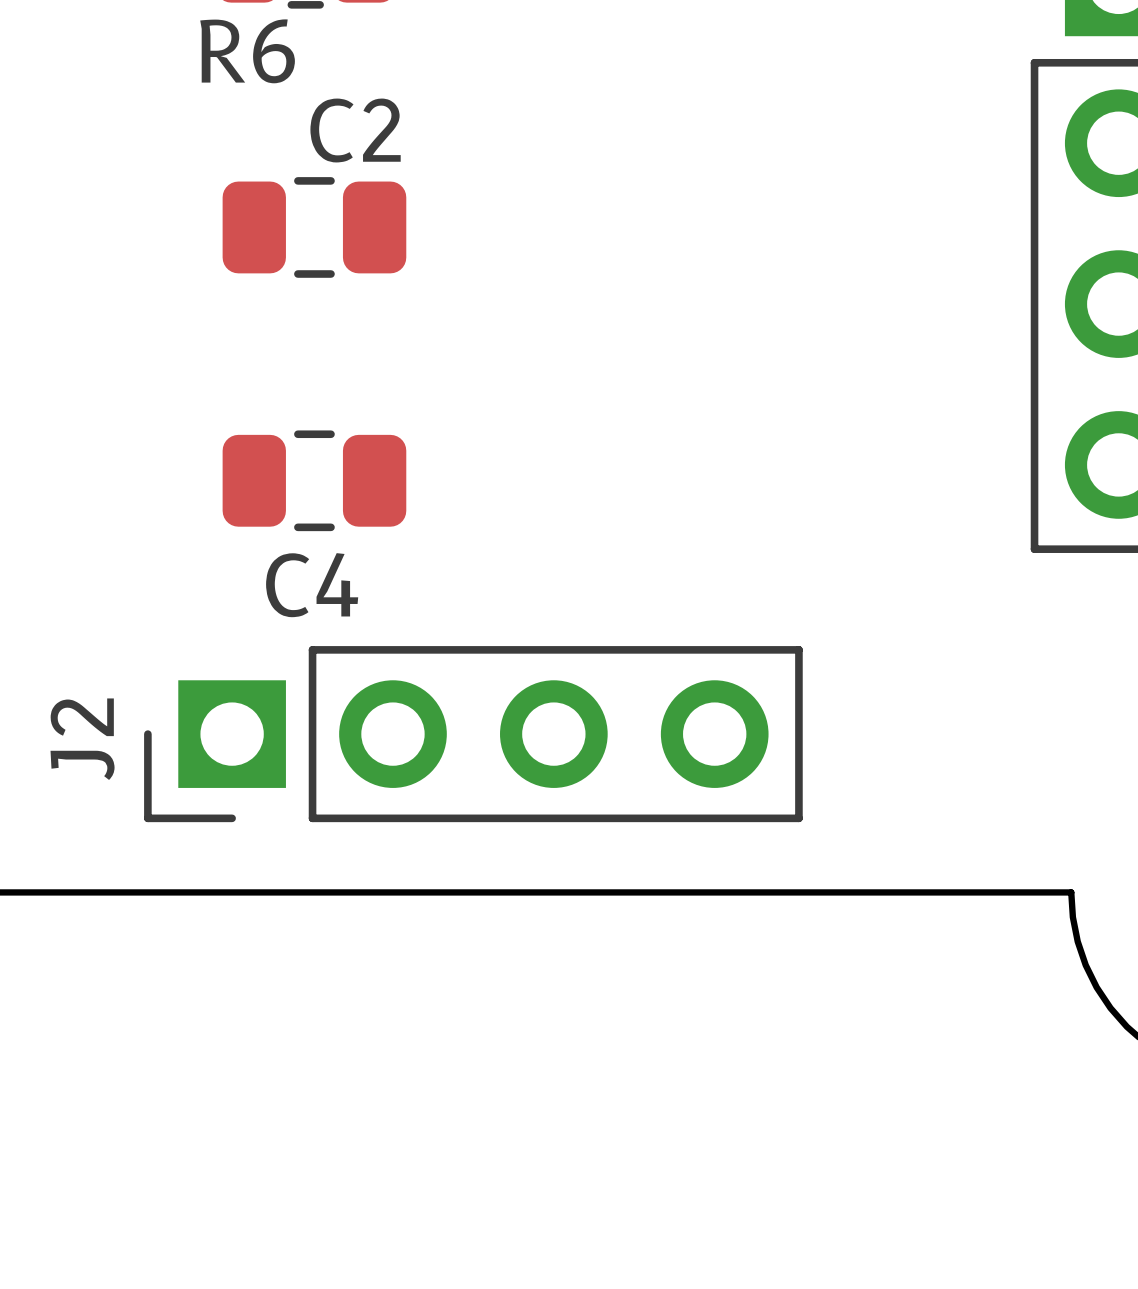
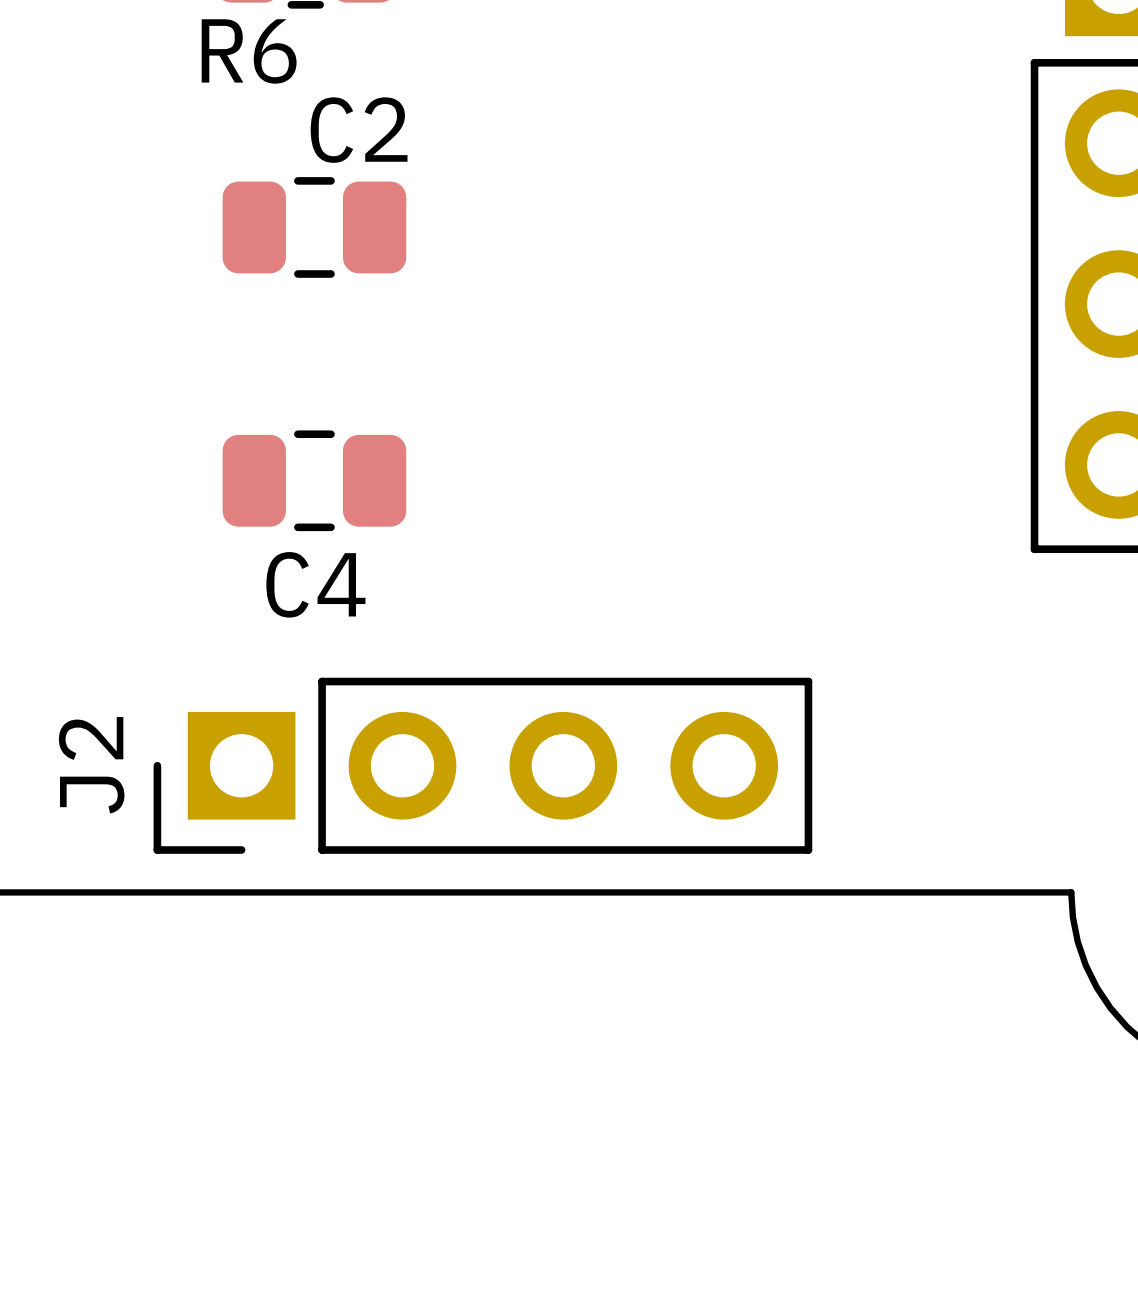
J2 position: (473, 734) -> (482, 765)

